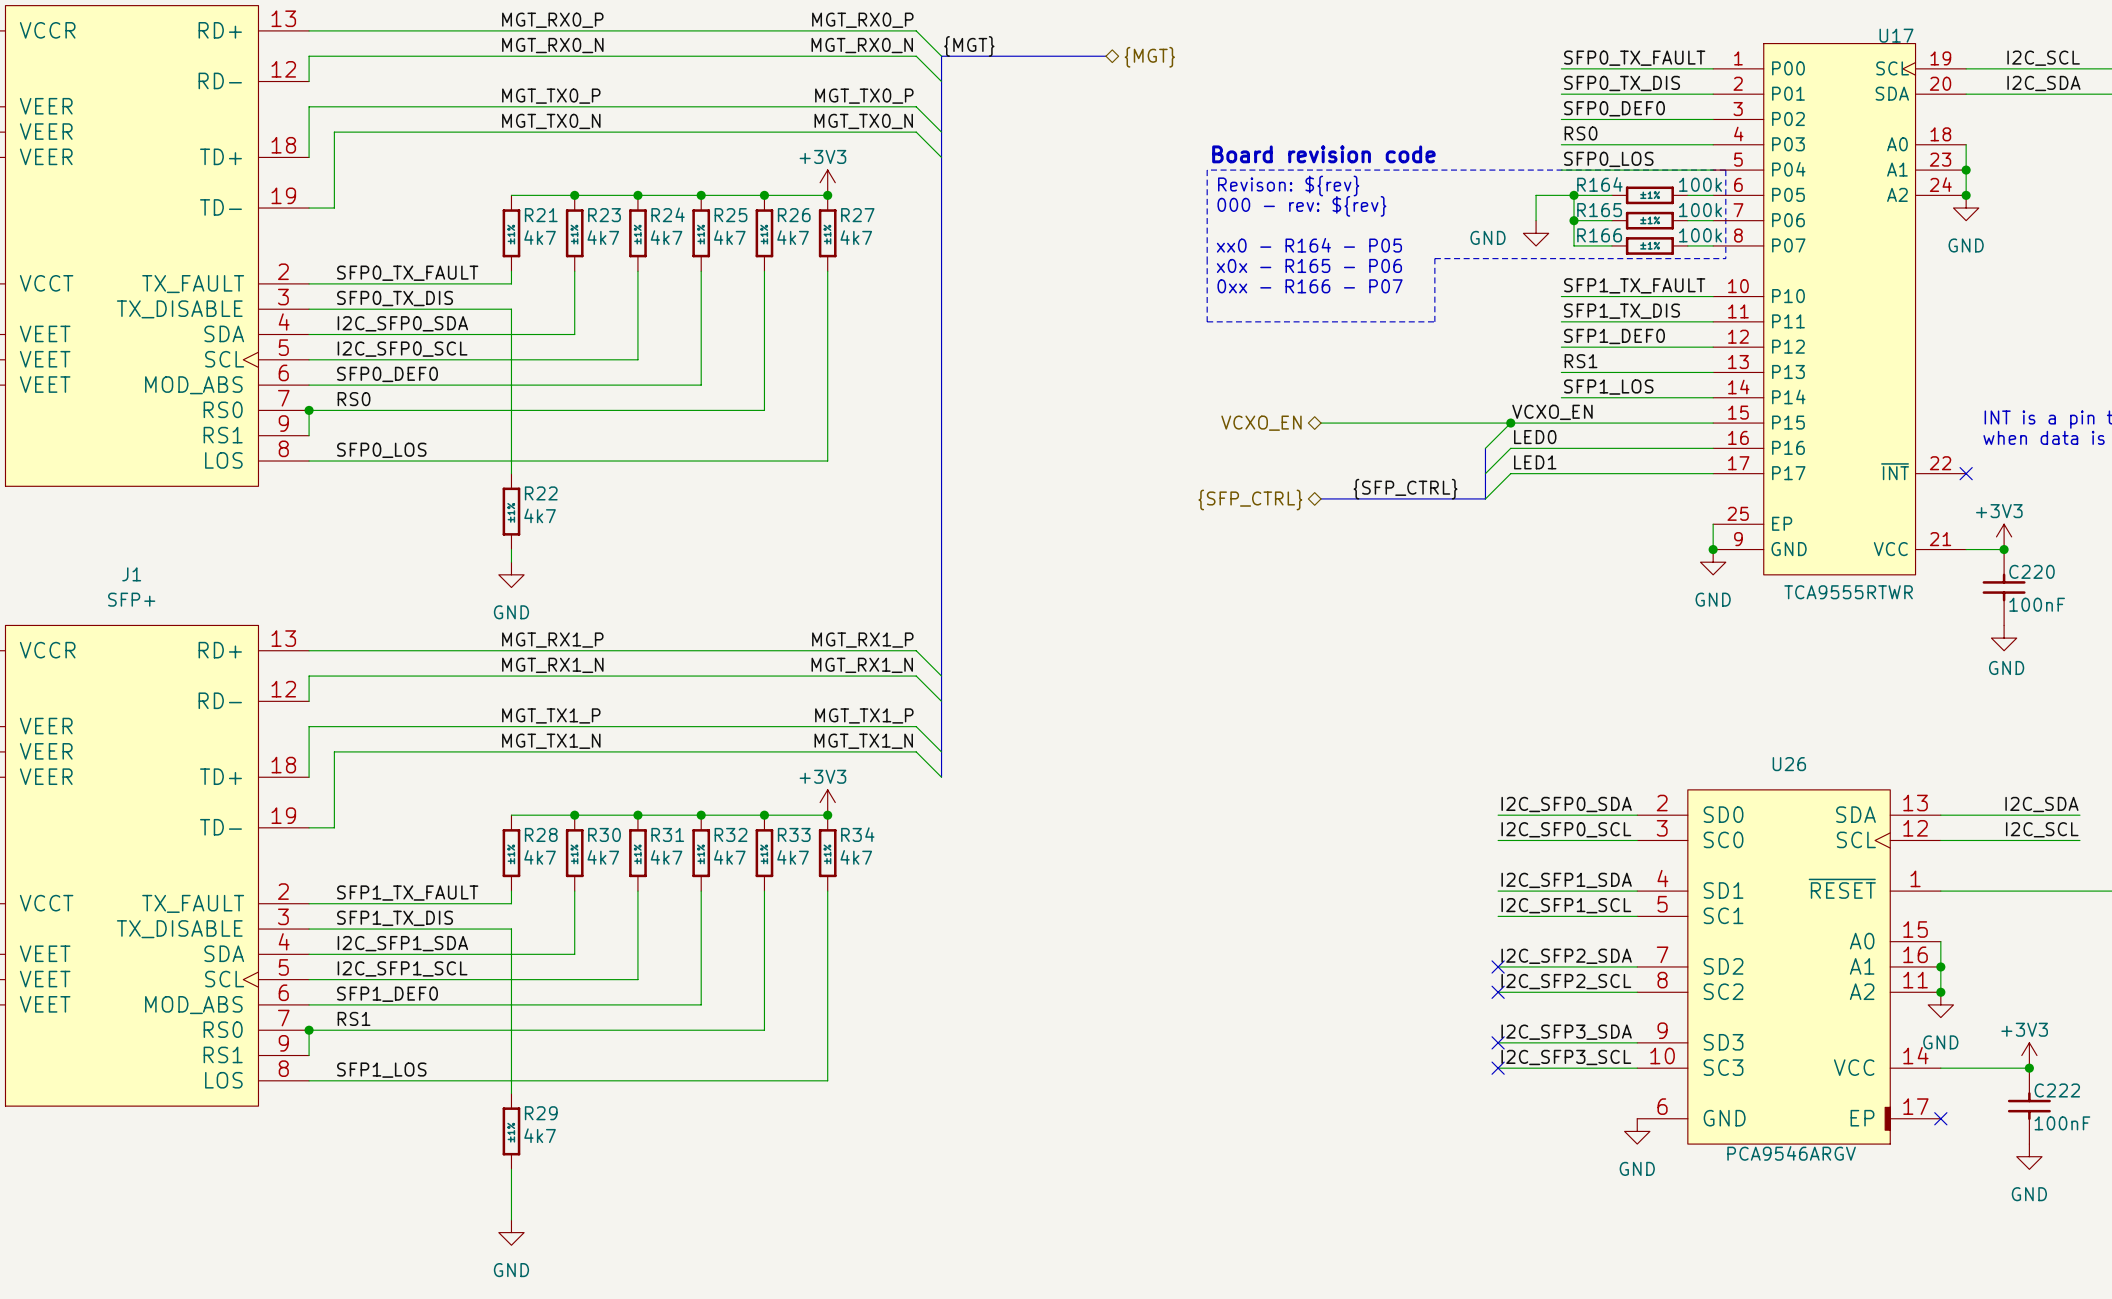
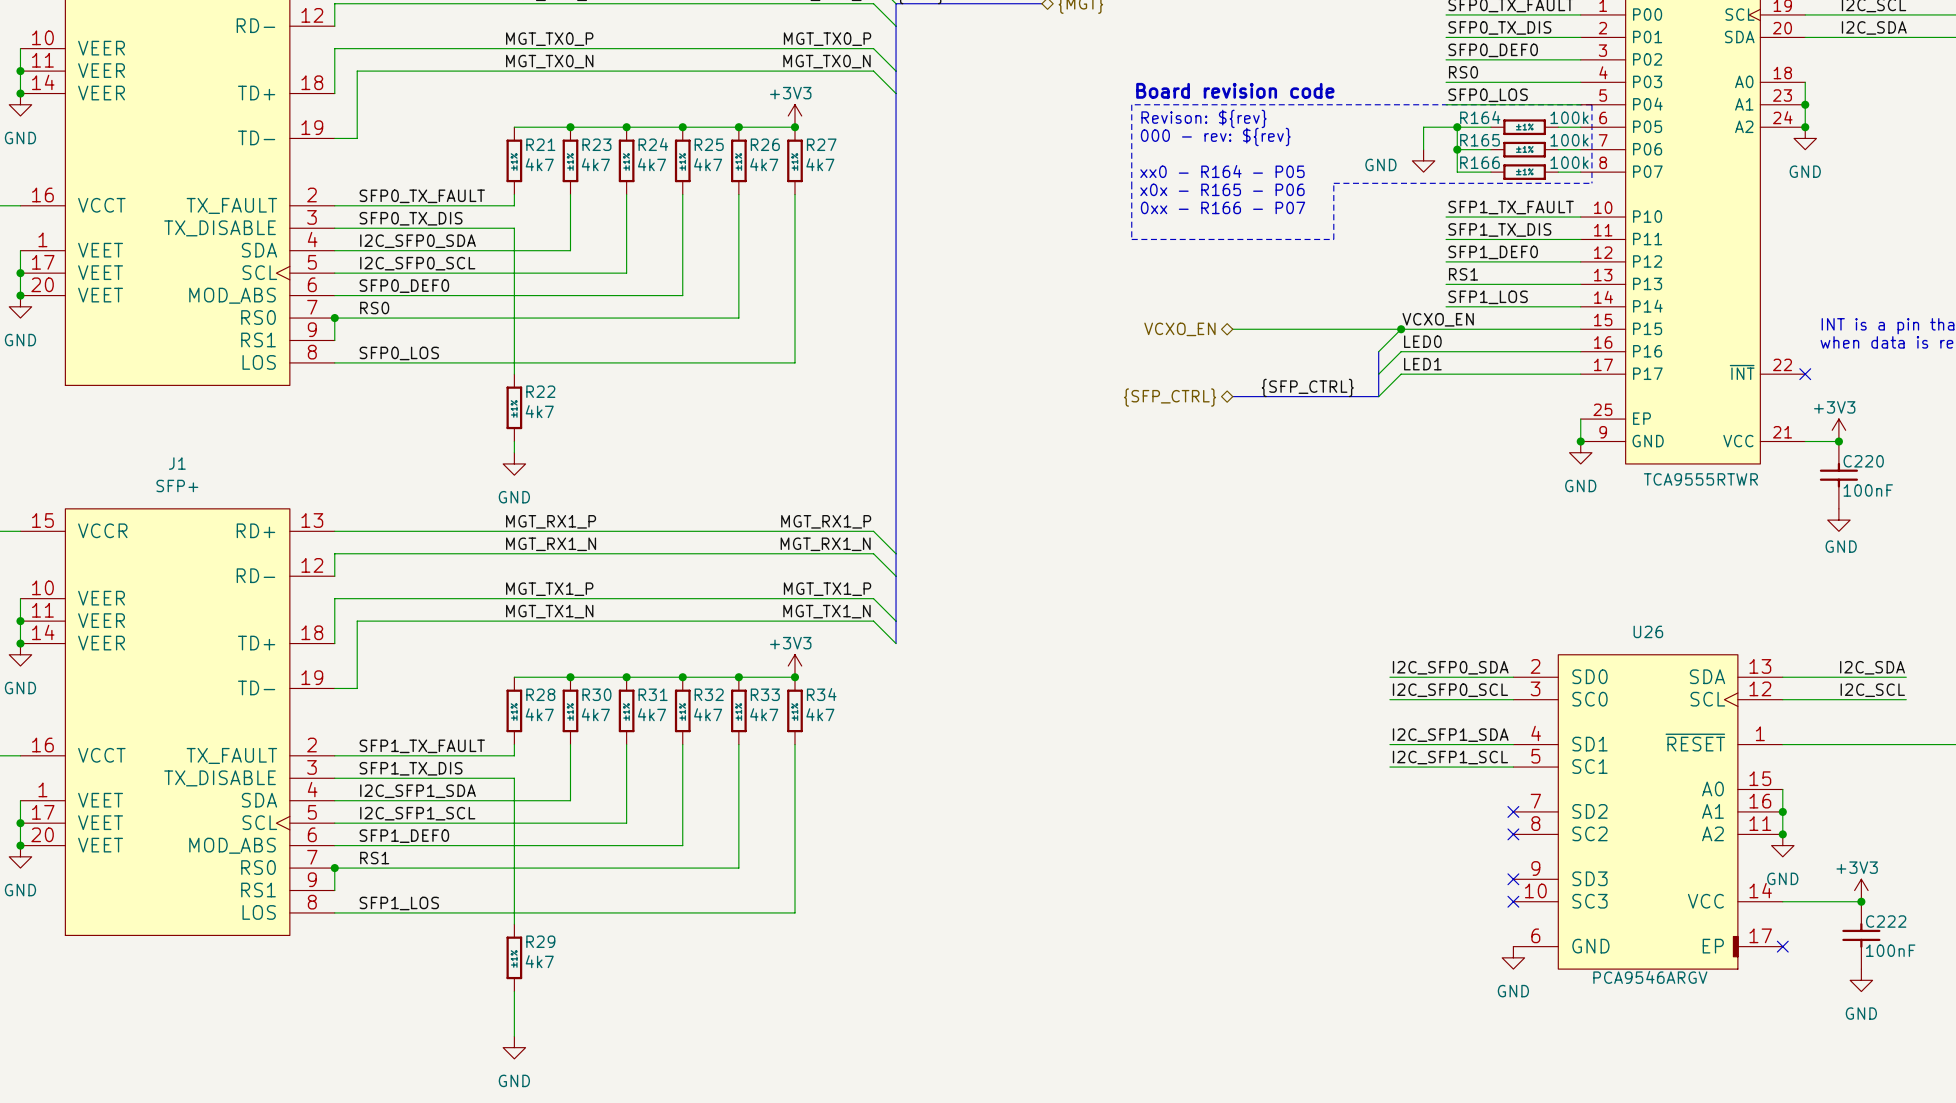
label: I2C_SFP2_SDA (1566, 956) -> none
wire: (1498, 966) (1637, 966) -> none
no-connect mark: (1498, 966) -> none
no-connect mark: none -> (1513, 811)
label: I2C_SFP2_SCL (1566, 981) -> none
wire: (1498, 992) (1637, 992) -> none
no-connect mark: (1498, 992) -> none
no-connect mark: none -> (1513, 834)
label: I2C_SFP3_SDA (1566, 1032) -> none
wire: (1498, 1042) (1637, 1042) -> none
no-connect mark: (1498, 1042) -> none
no-connect mark: none -> (1513, 879)
label: I2C_SFP3_SCL (1566, 1057) -> none
wire: (1498, 1068) (1637, 1068) -> none
no-connect mark: (1498, 1068) -> none
no-connect mark: none -> (1513, 901)

